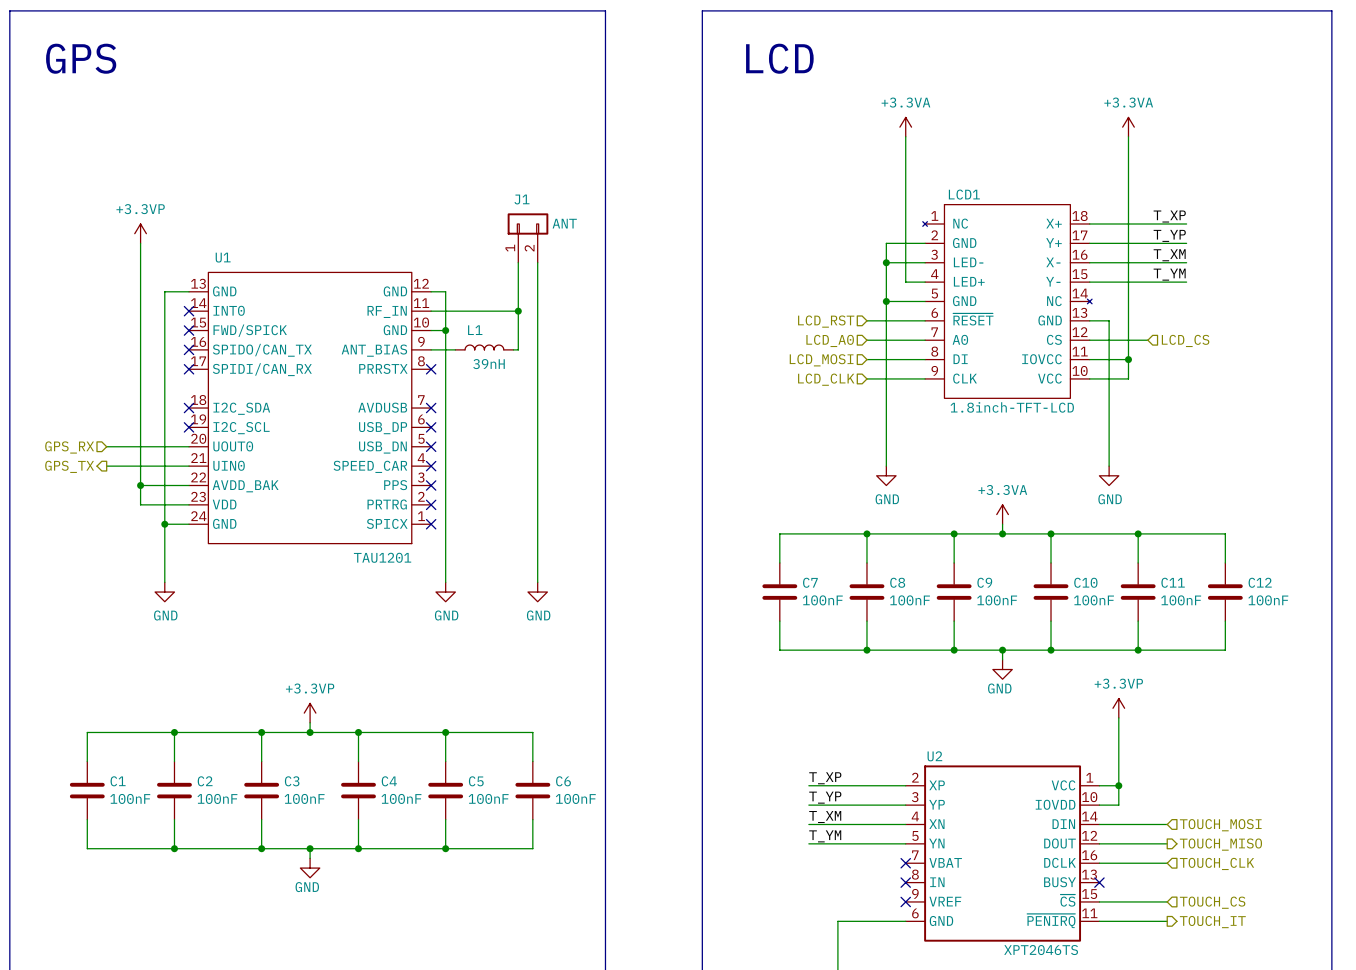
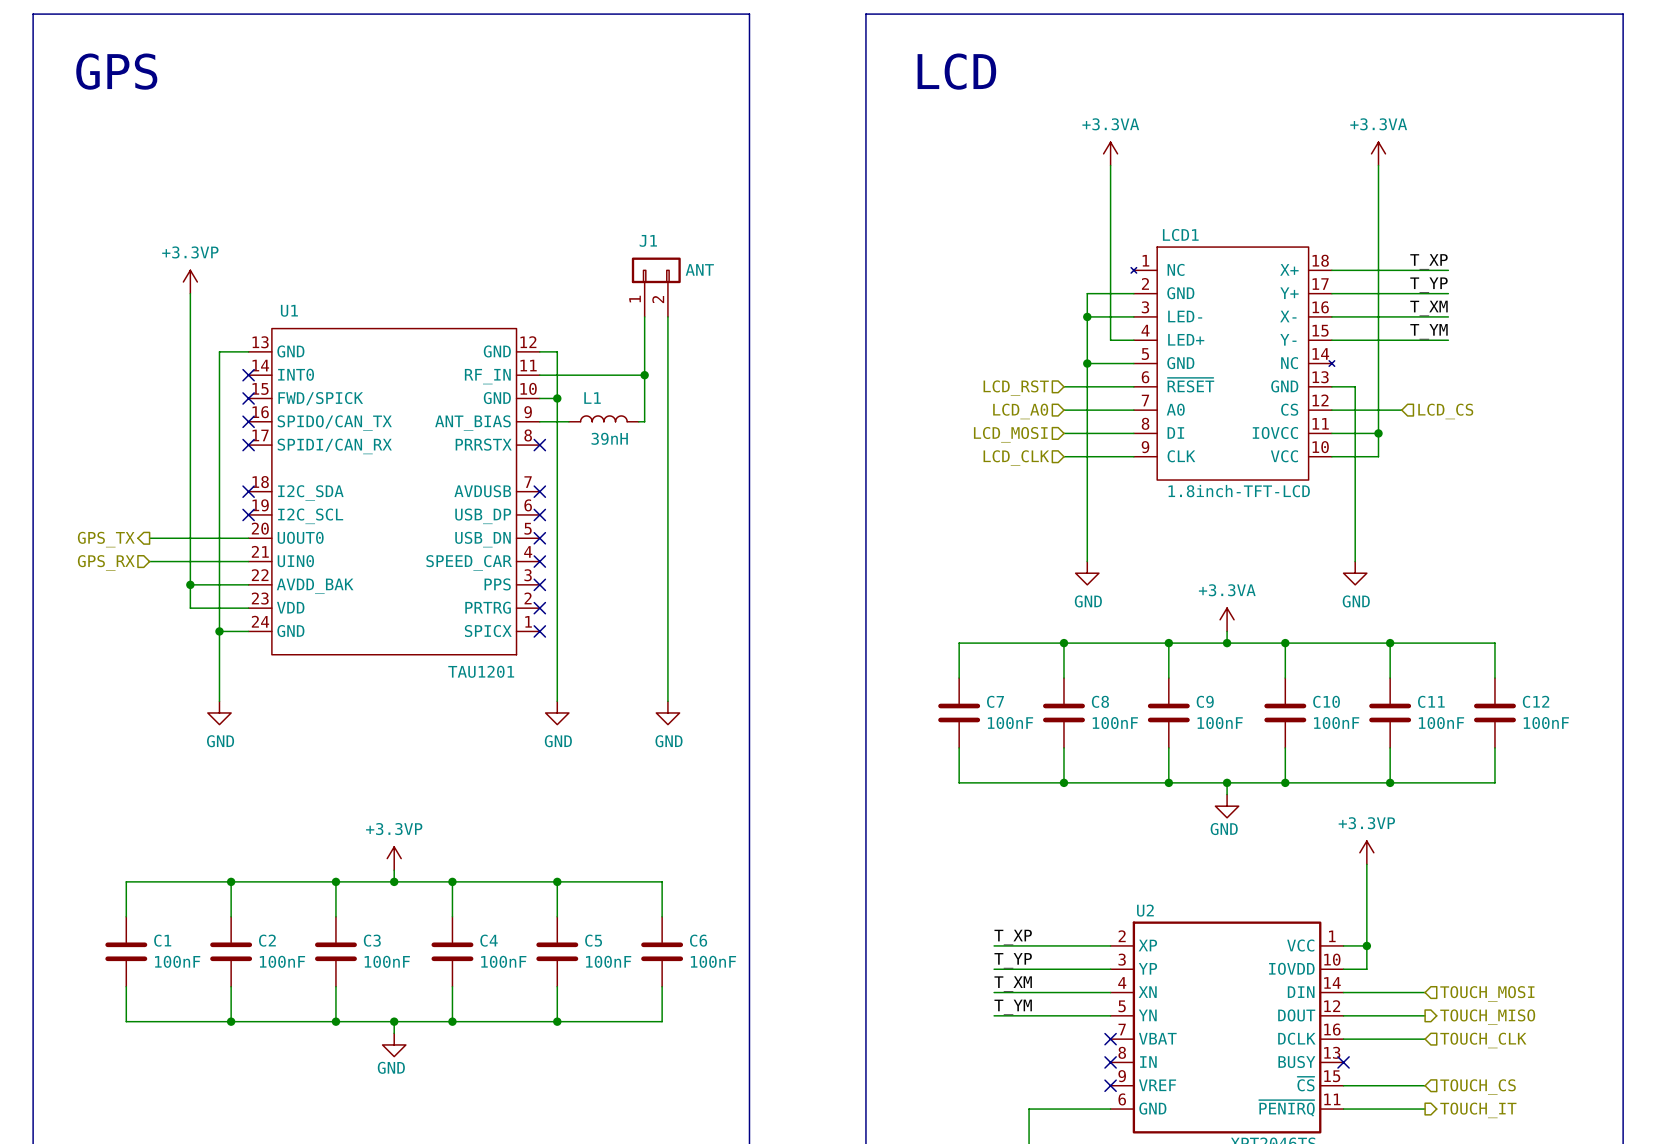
hierarchical label shape: input (69, 447) -> output (106, 539)
hierarchical label: GPS_RX (69, 447) -> GPS_TX (106, 539)
hierarchical label shape: output (69, 466) -> input (106, 562)
hierarchical label: GPS_TX (69, 466) -> GPS_RX (106, 562)

